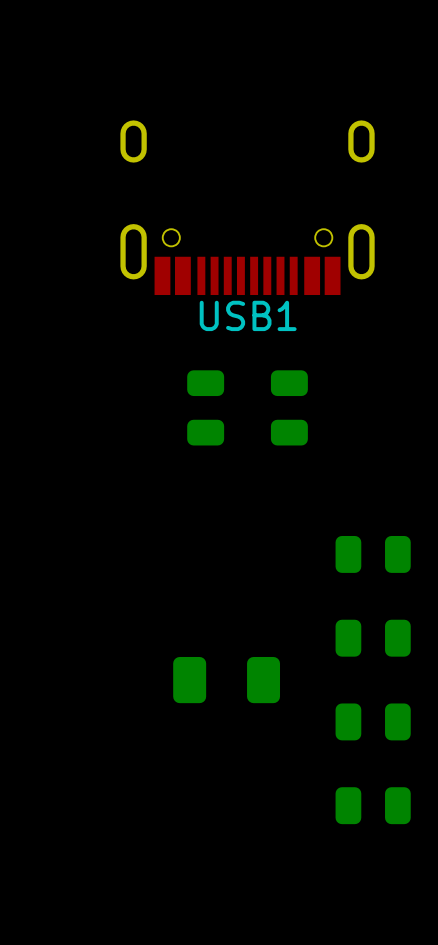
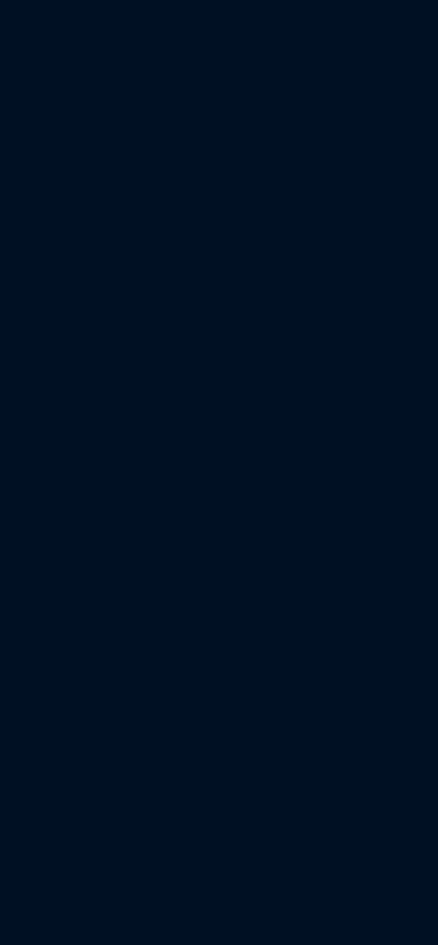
USB1: (247, 207) -> none
part: (205, 407) -> none
part: (289, 407) -> none
part: (373, 554) -> none
part: (373, 638) -> none
part: (226, 680) -> none
part: (373, 721) -> none
part: (373, 805) -> none

